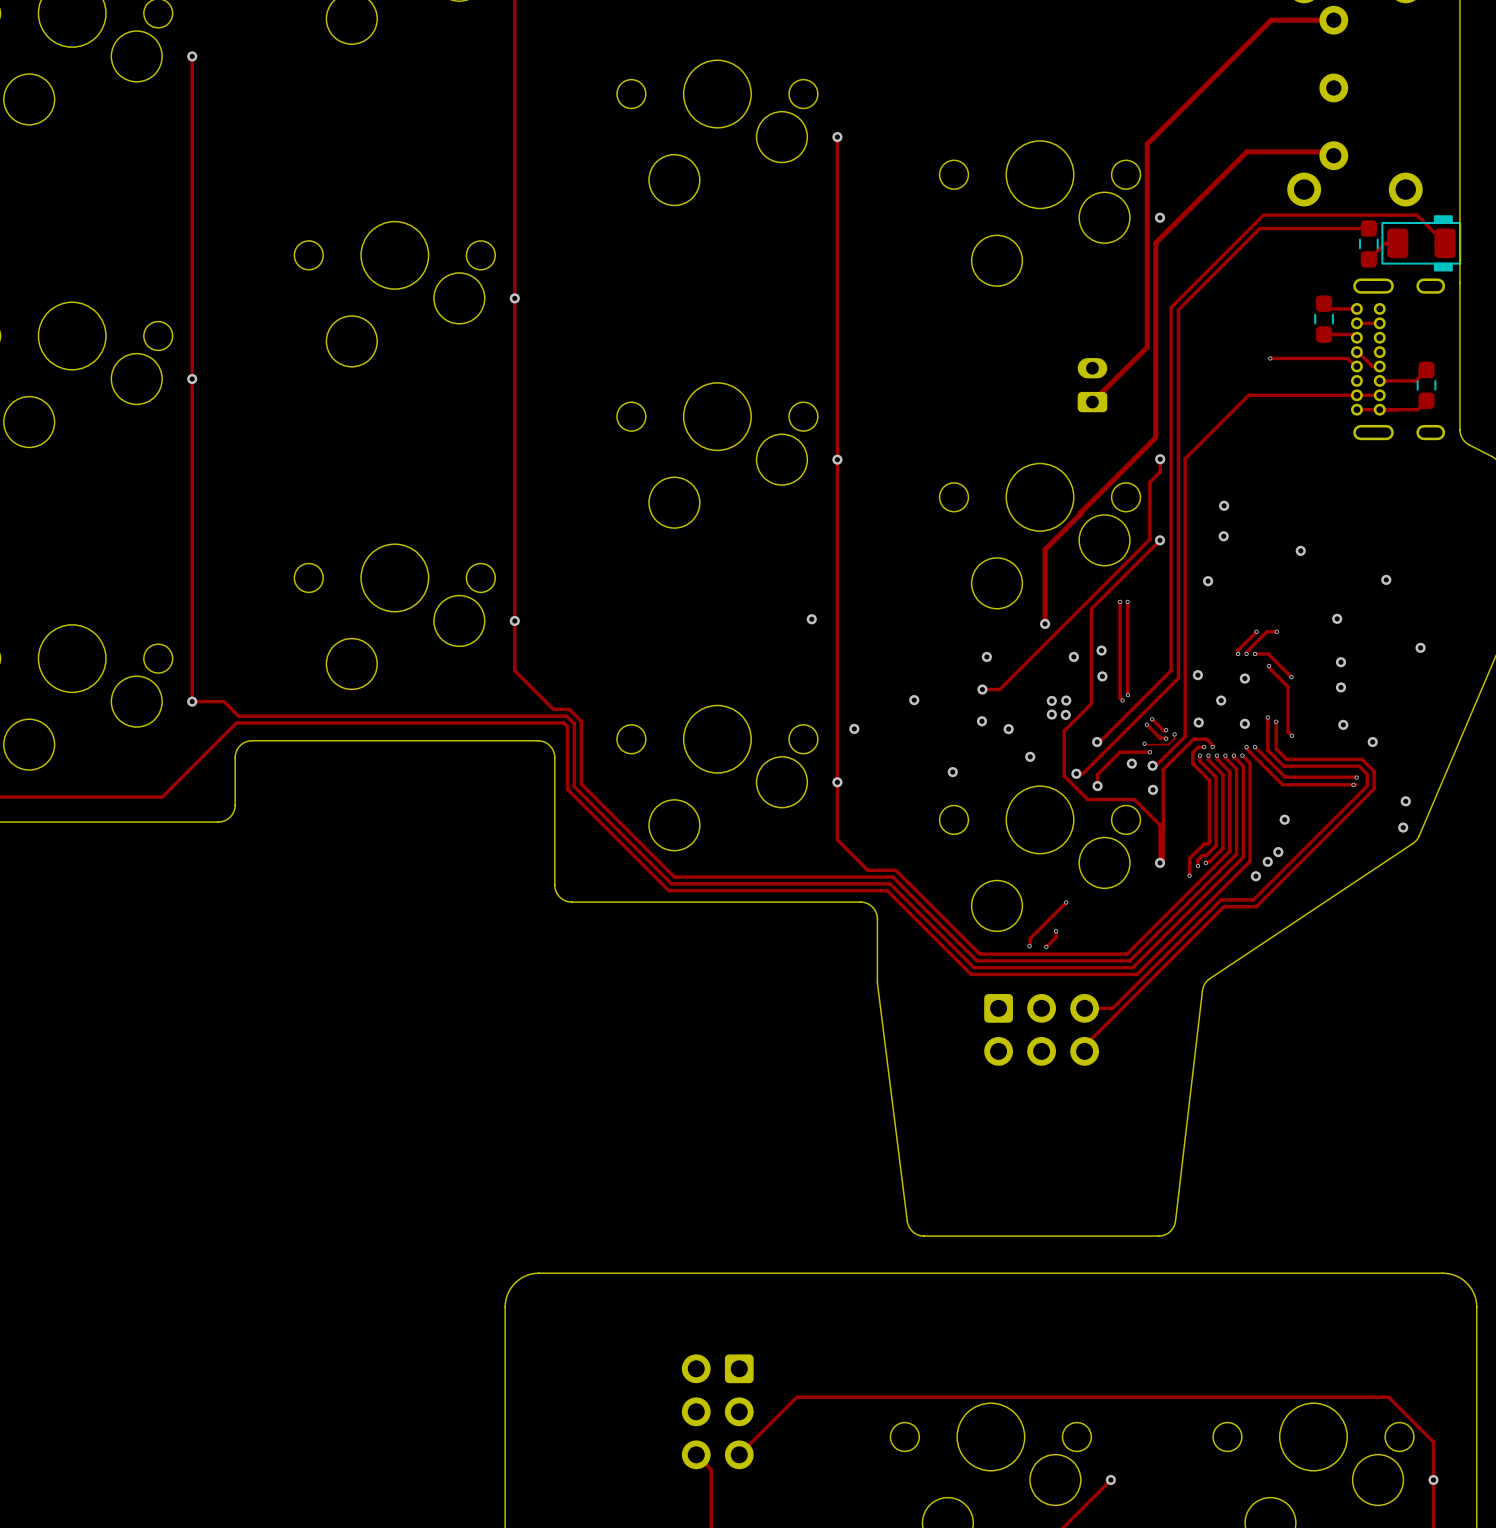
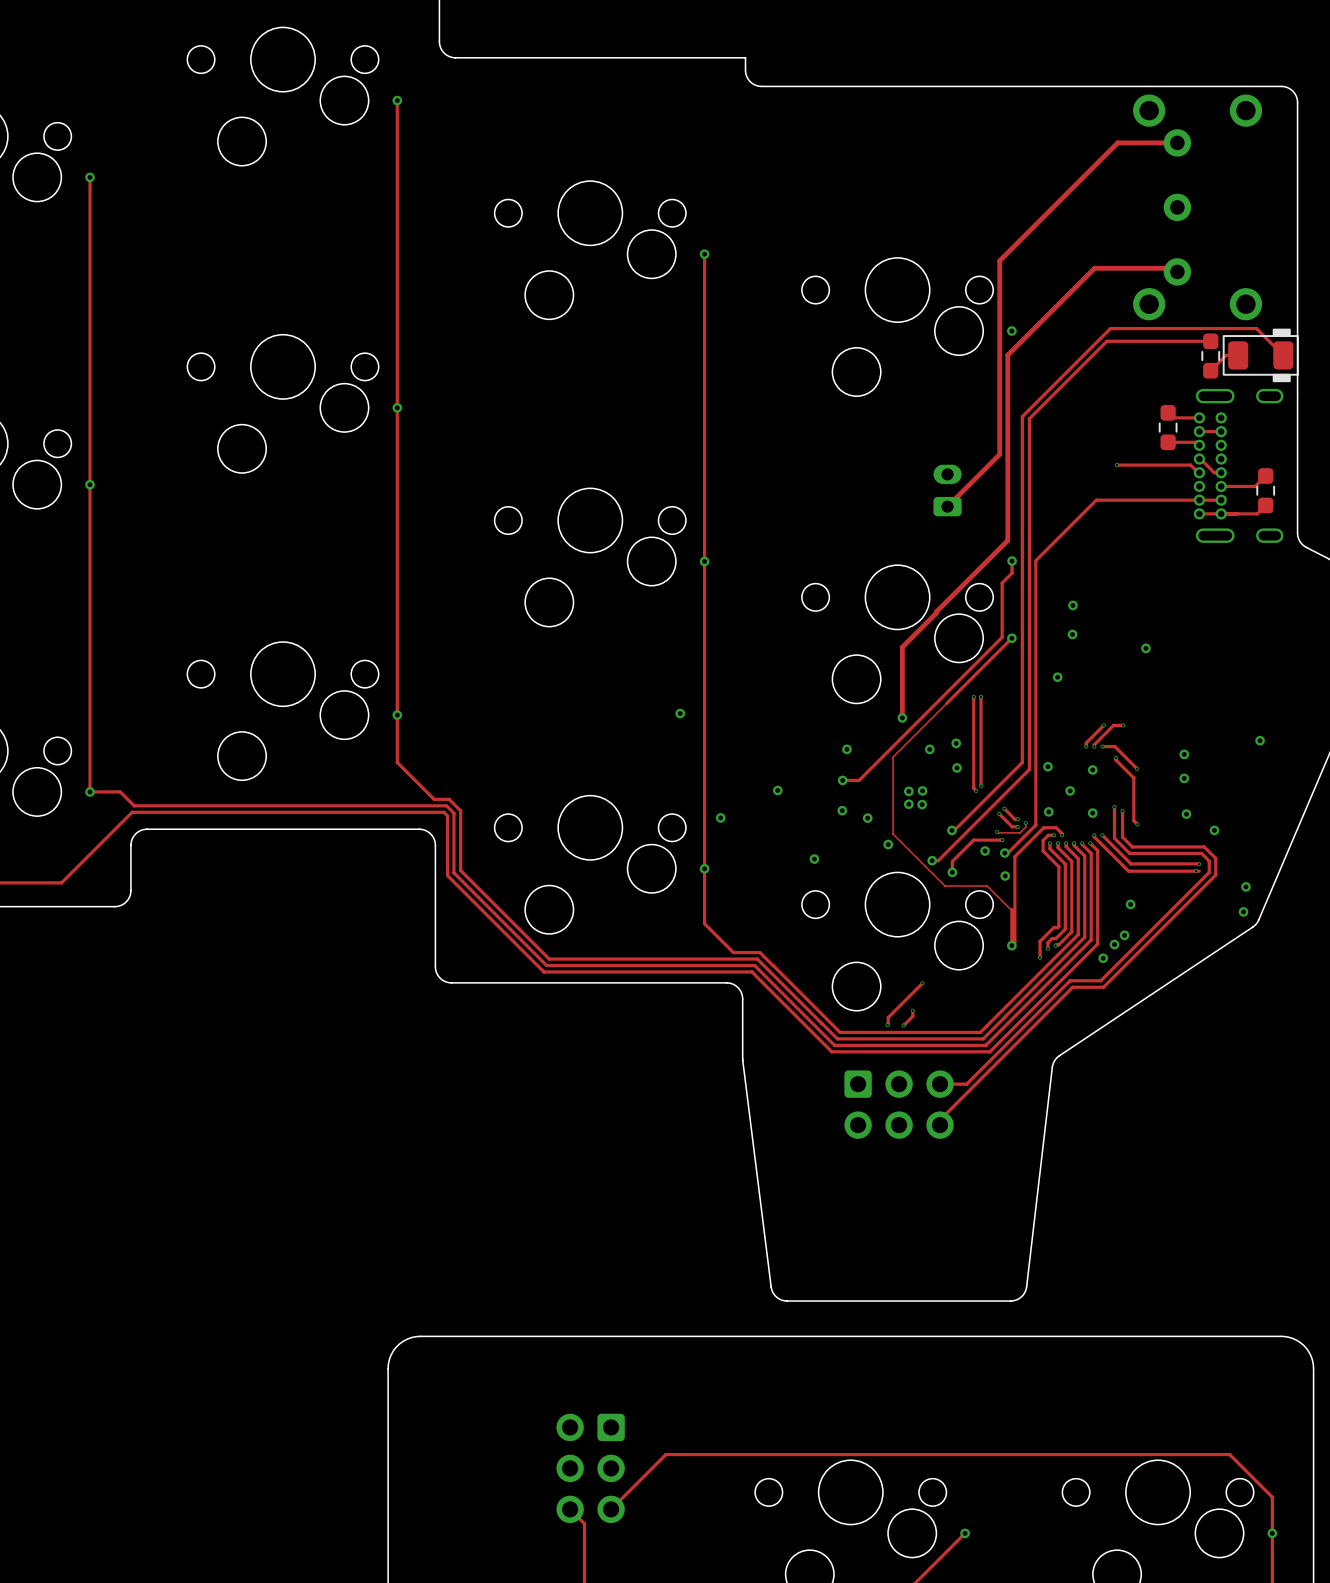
via: (1386, 579) -> none
track: (1091, 608) (1091, 703) (1064, 730) (1064, 776) (1087, 799) (1134, 799) (1160, 825) -> (946, 703) (893, 757) (893, 834) (944, 886) (987, 886) (1011, 910)
via: (1337, 618) -> none

